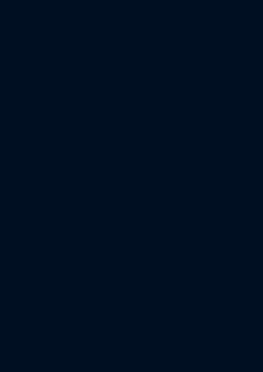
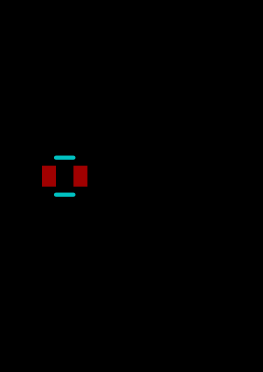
part: none -> (64, 176)

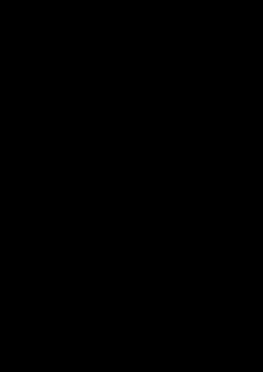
part: (64, 176) -> none

